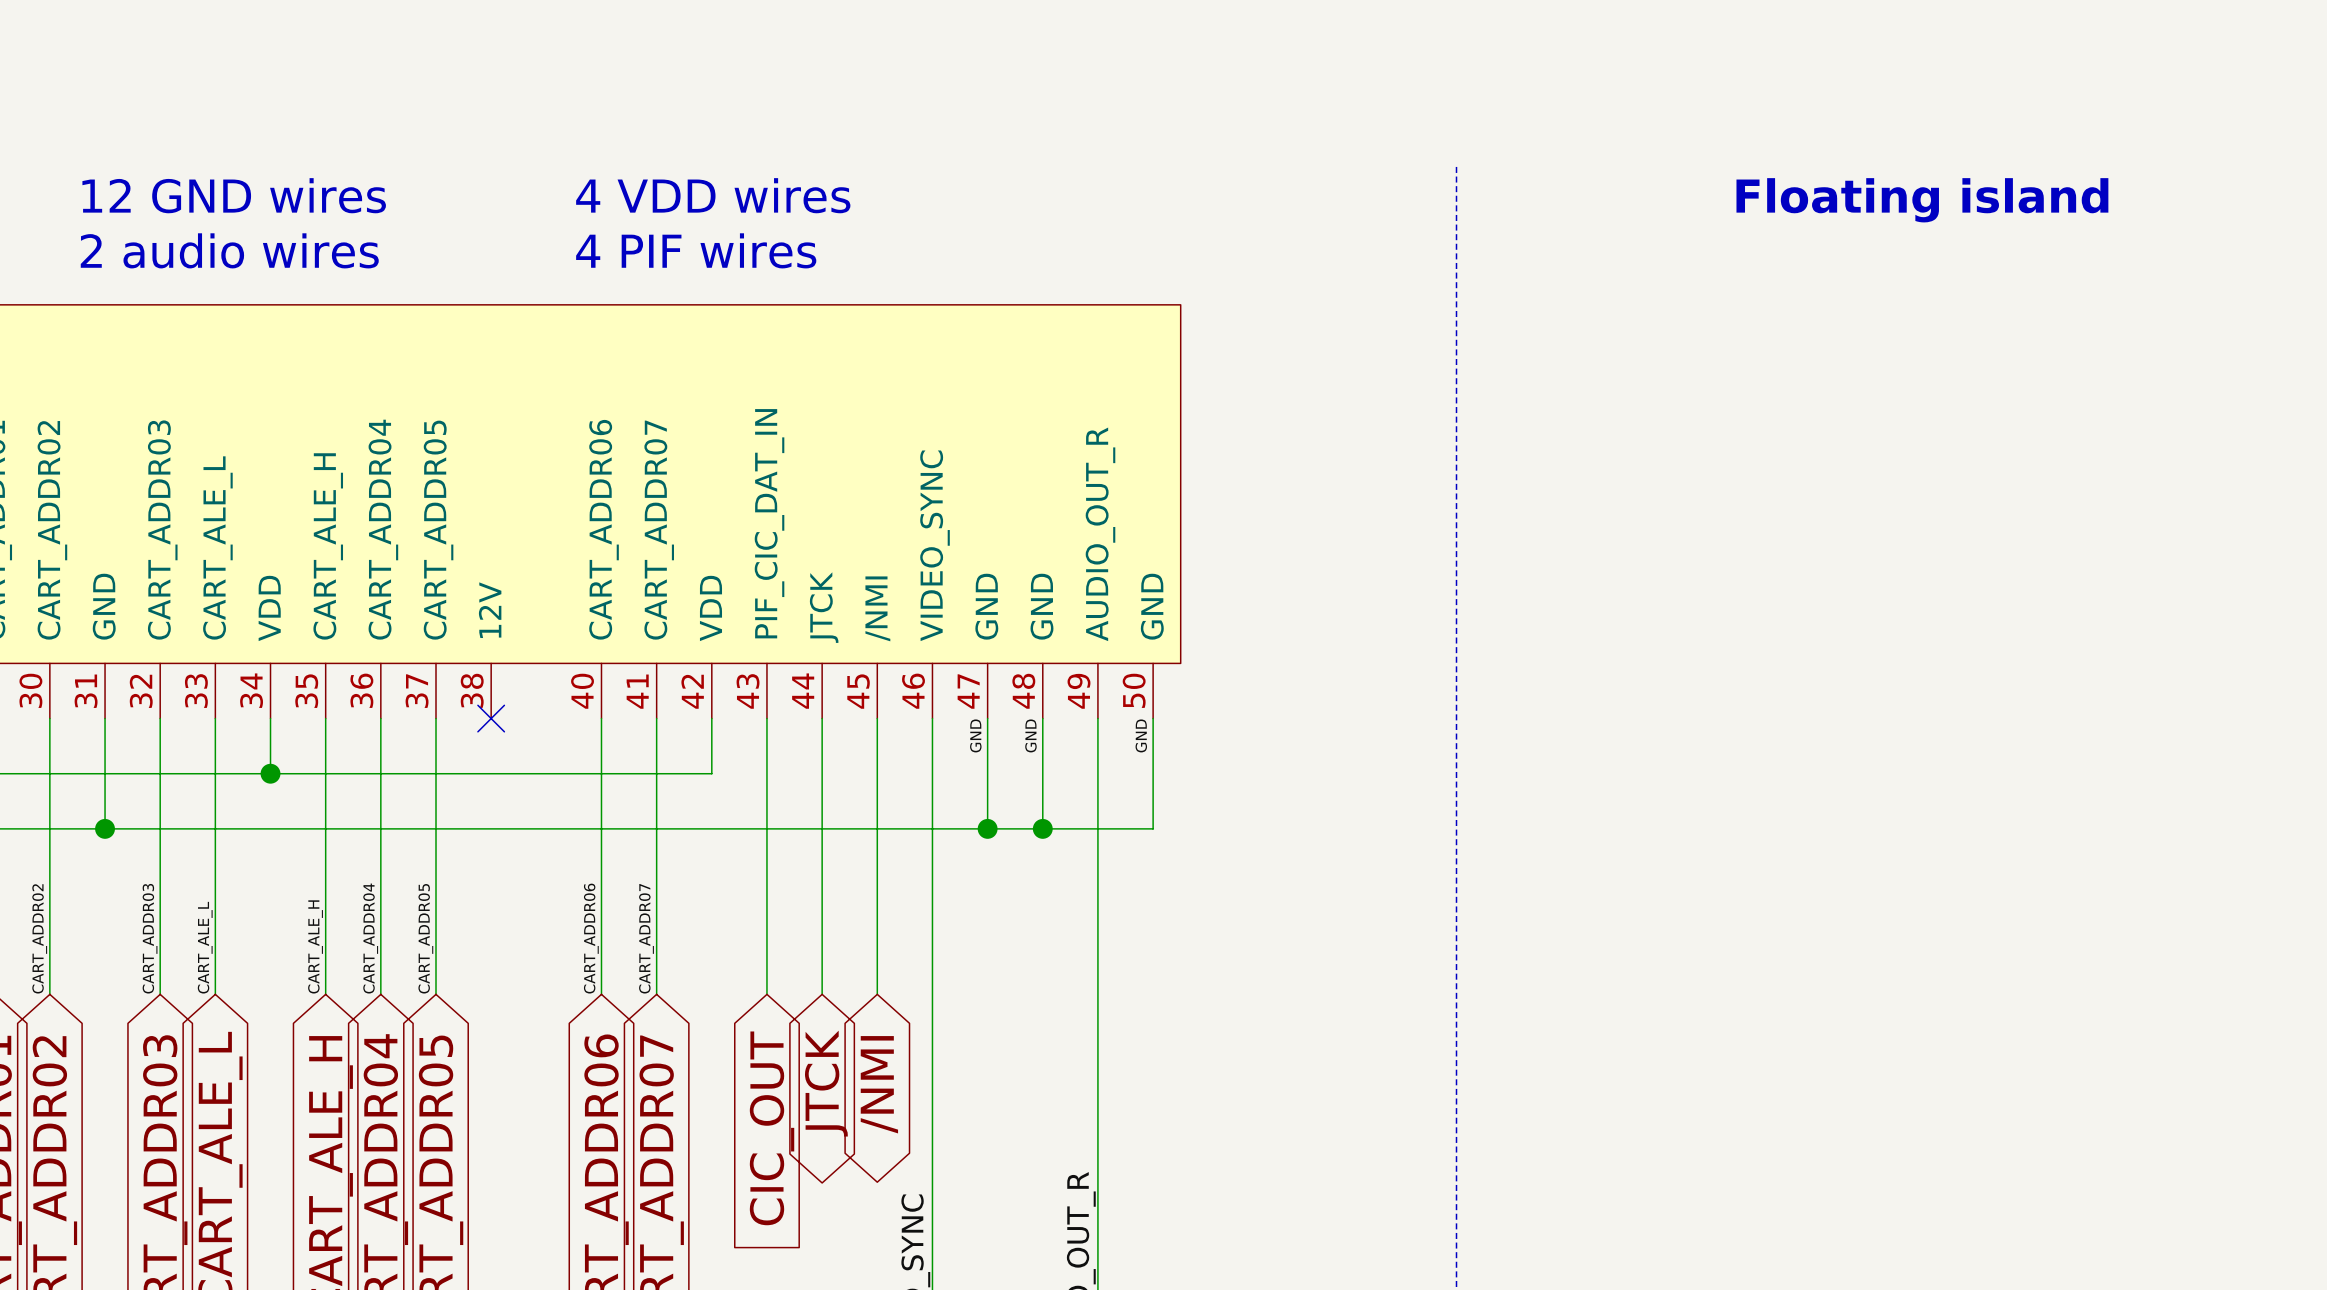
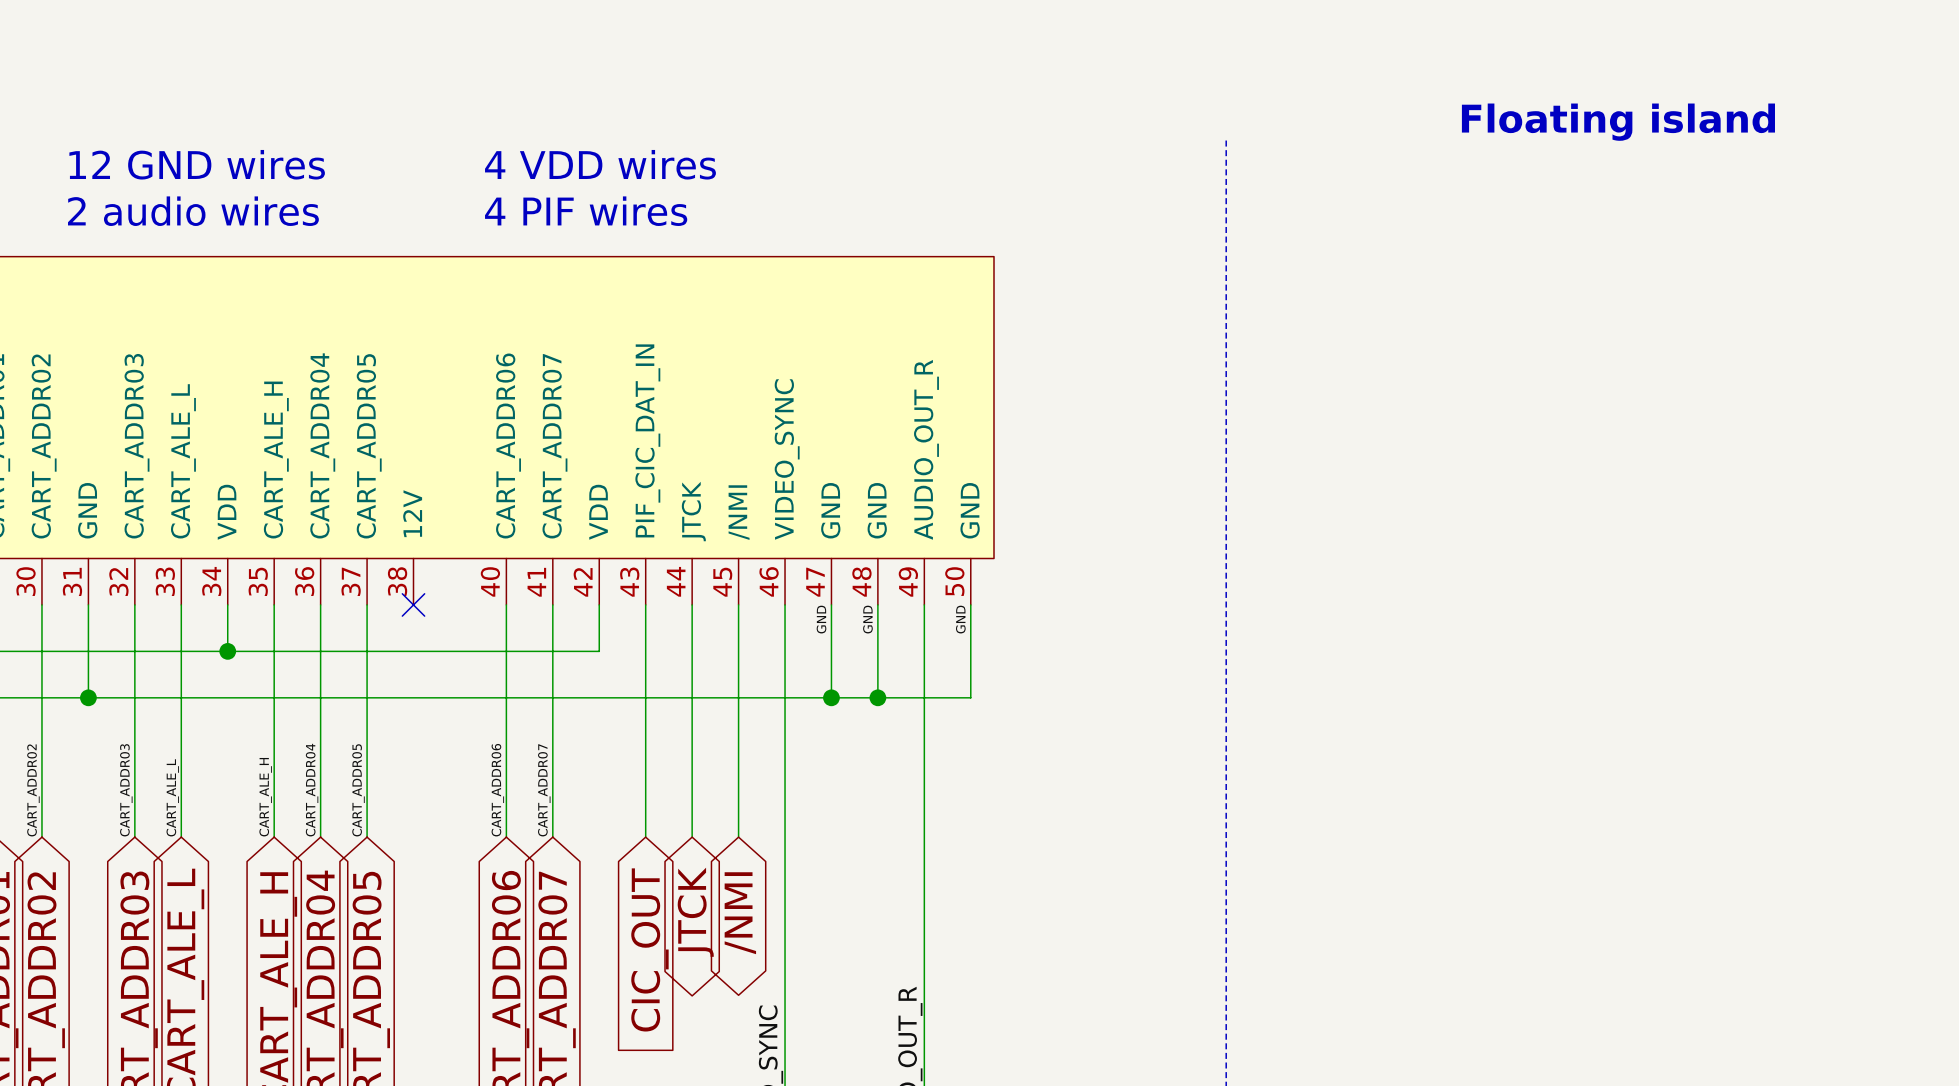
text position: Floating island (1922, 200) -> Floating island (1618, 122)

